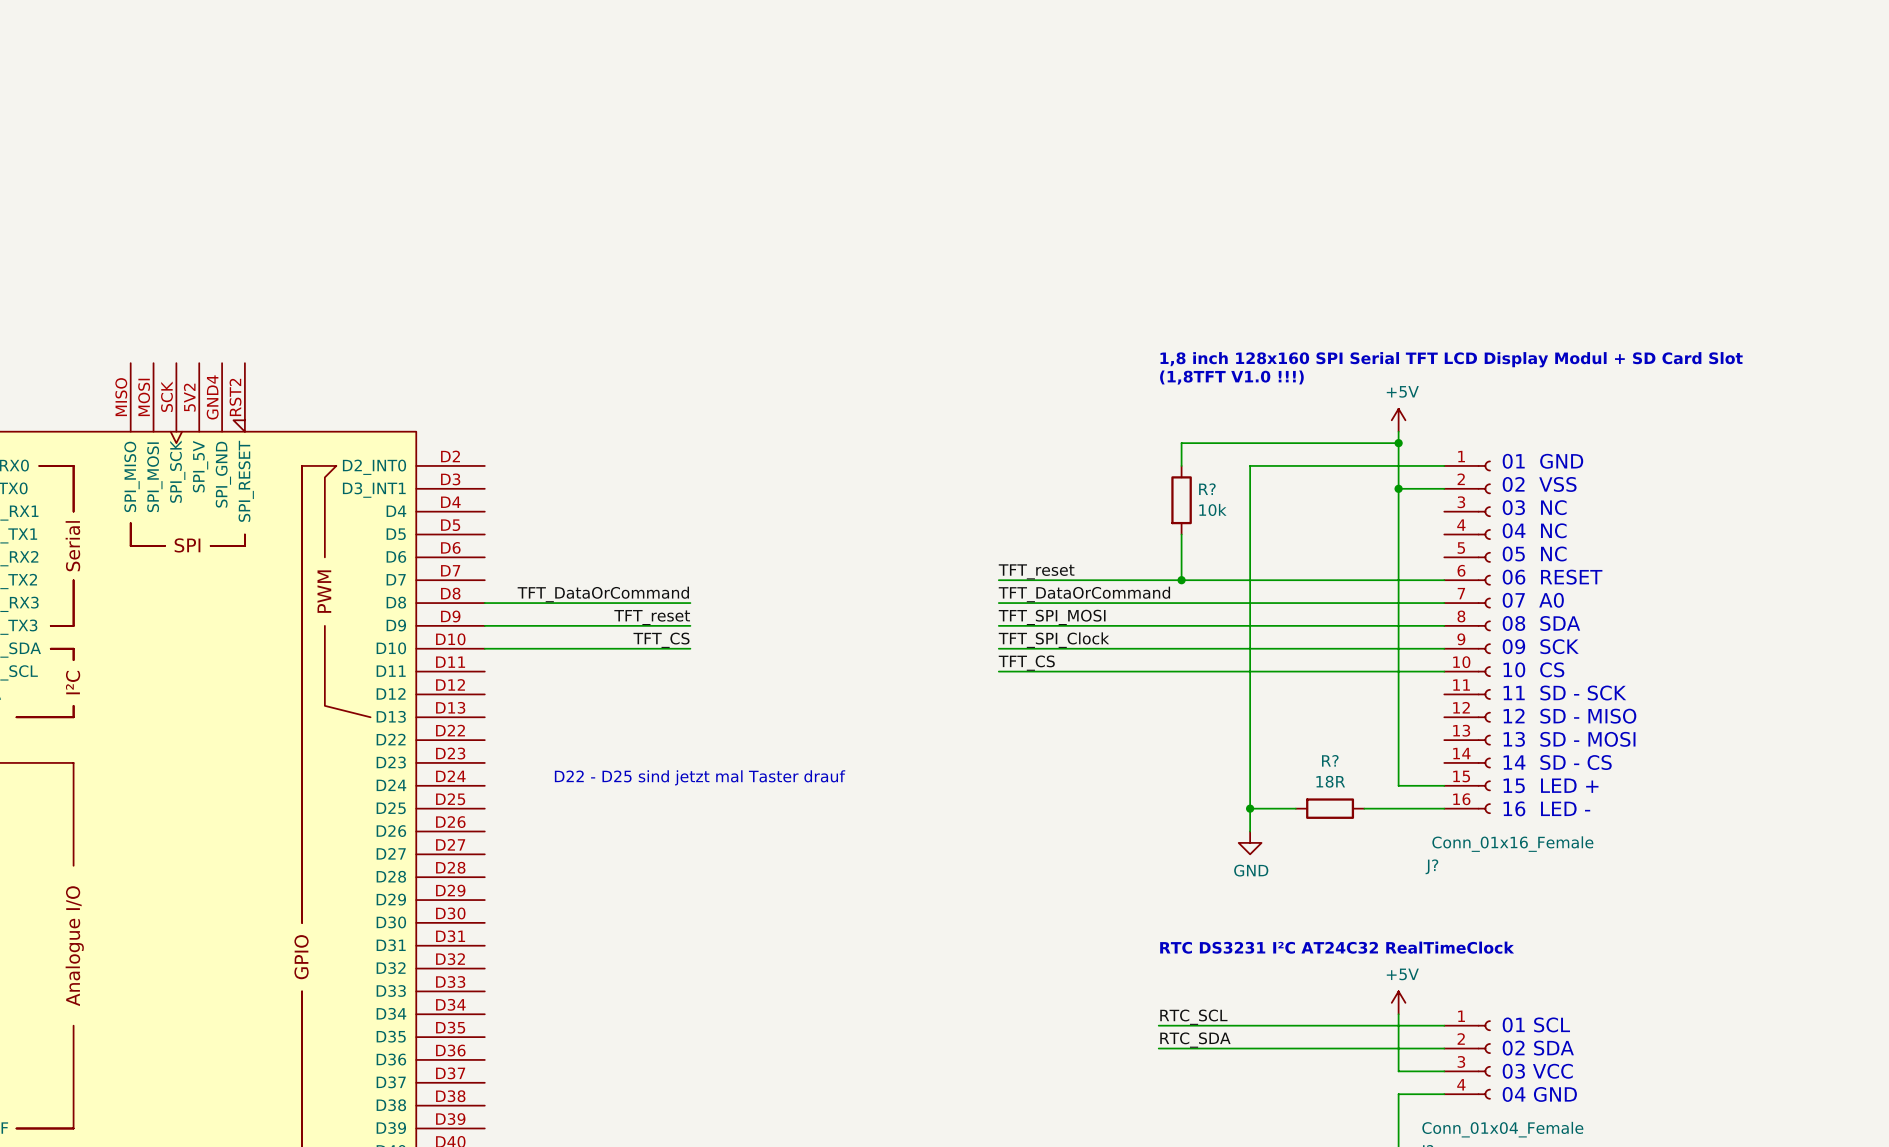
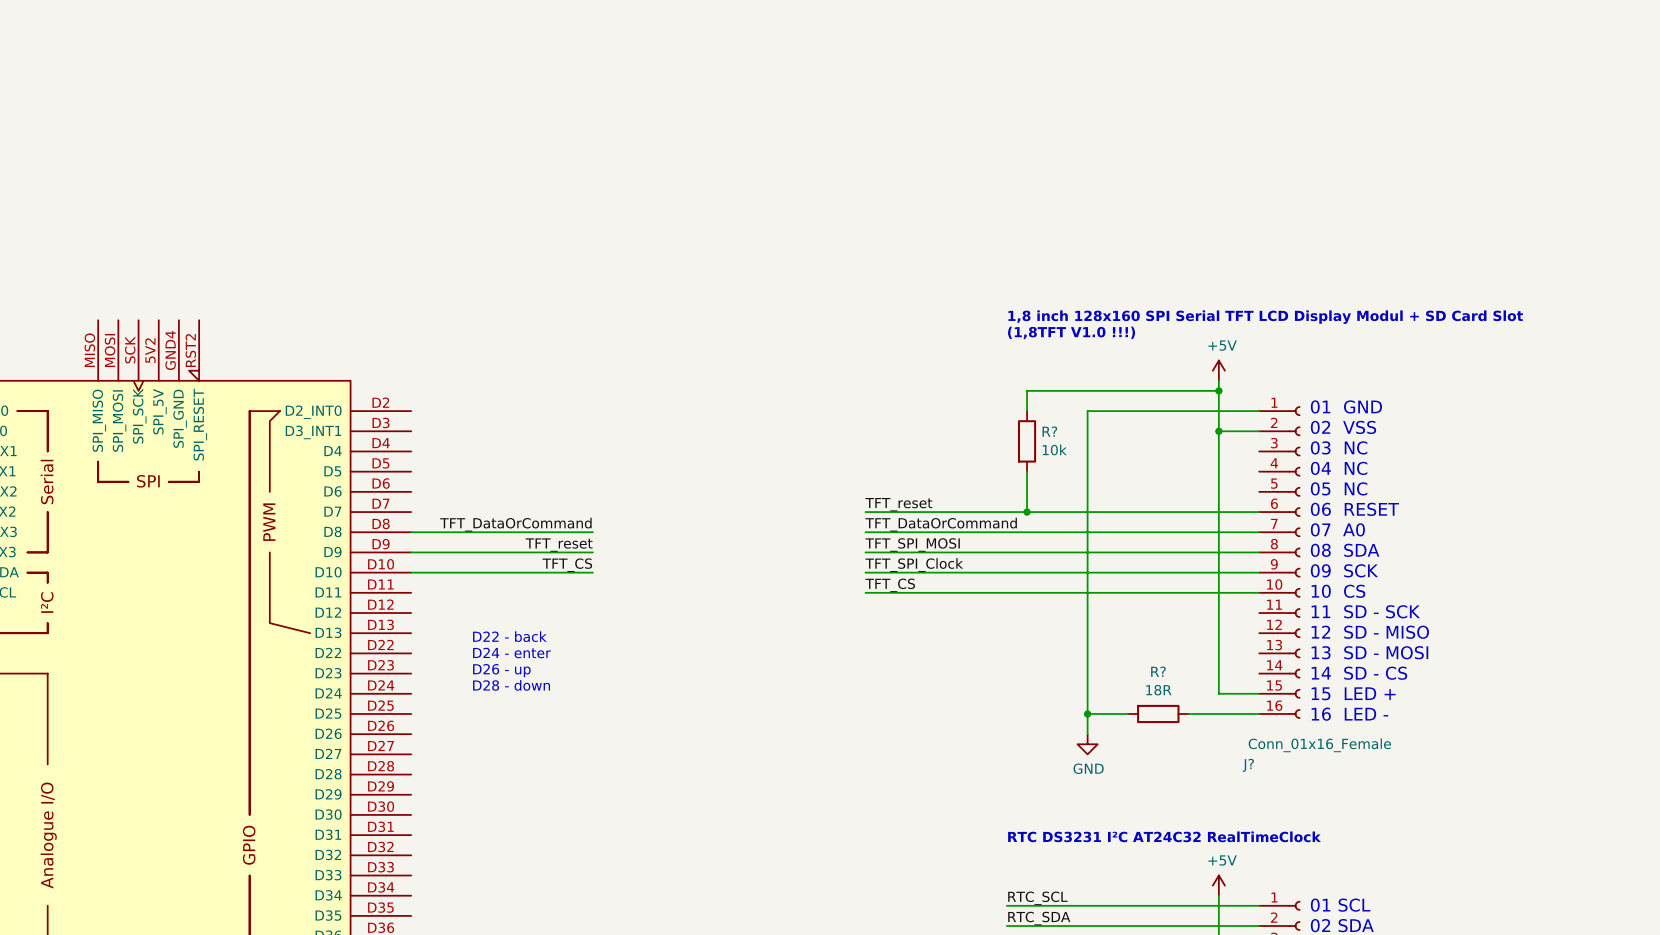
text: none -> D22 - back (509, 636)
text: none -> D24 - enter (511, 653)
text: none -> D26 - up (501, 670)
text: D22 - D25 sind jetzt mal Taster drauf (700, 777) -> D28 - down (511, 685)

